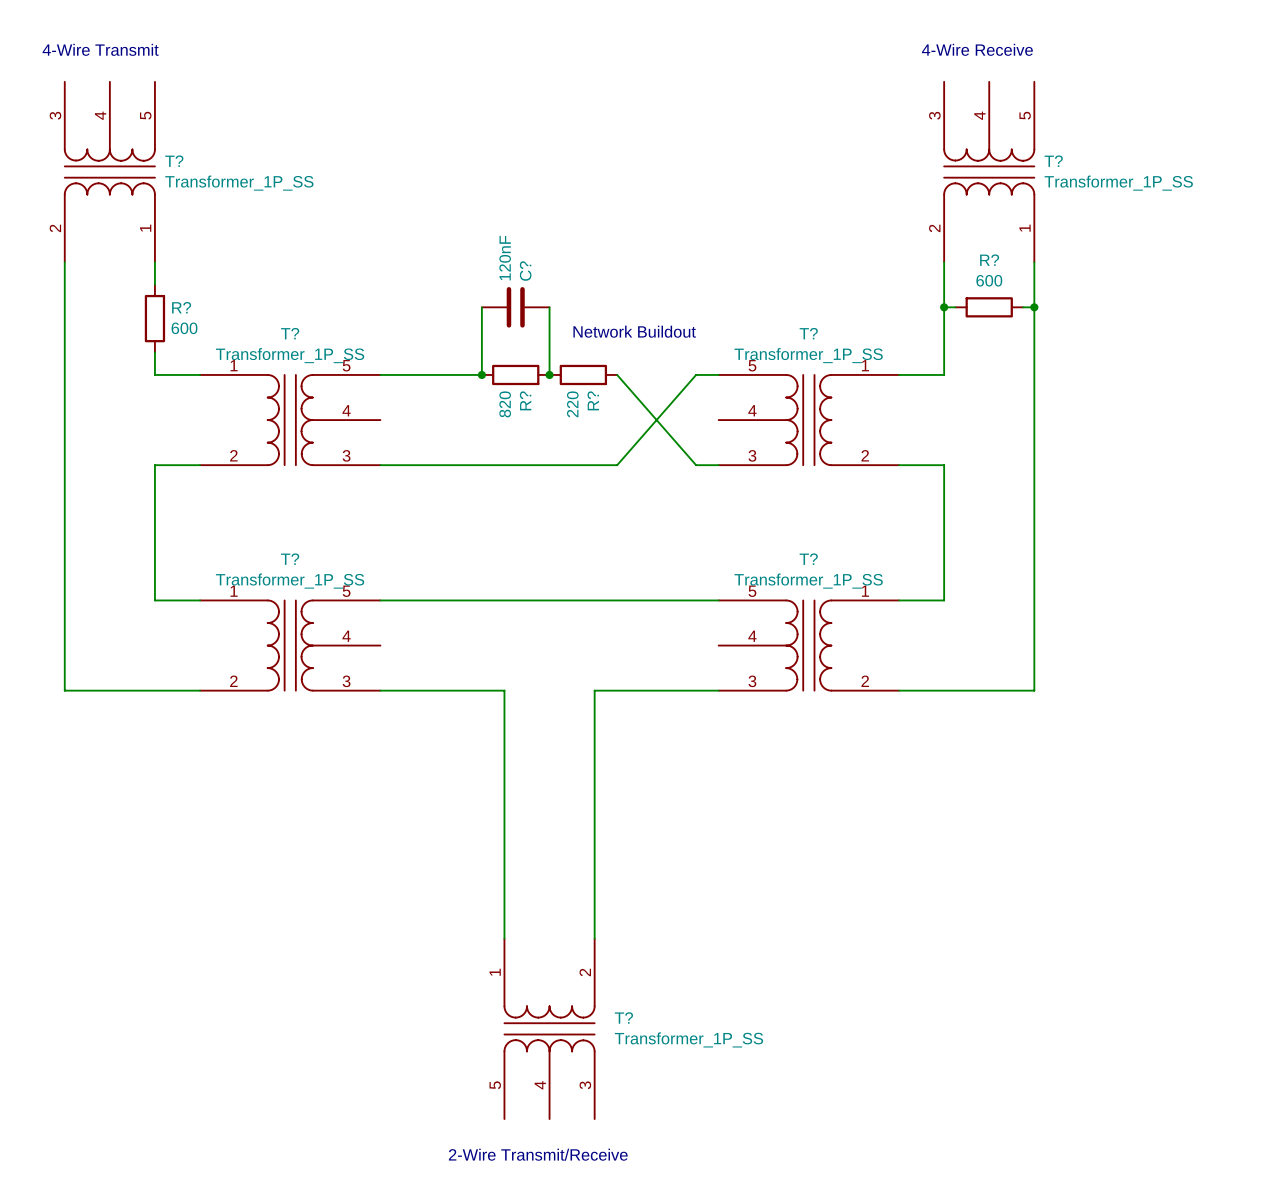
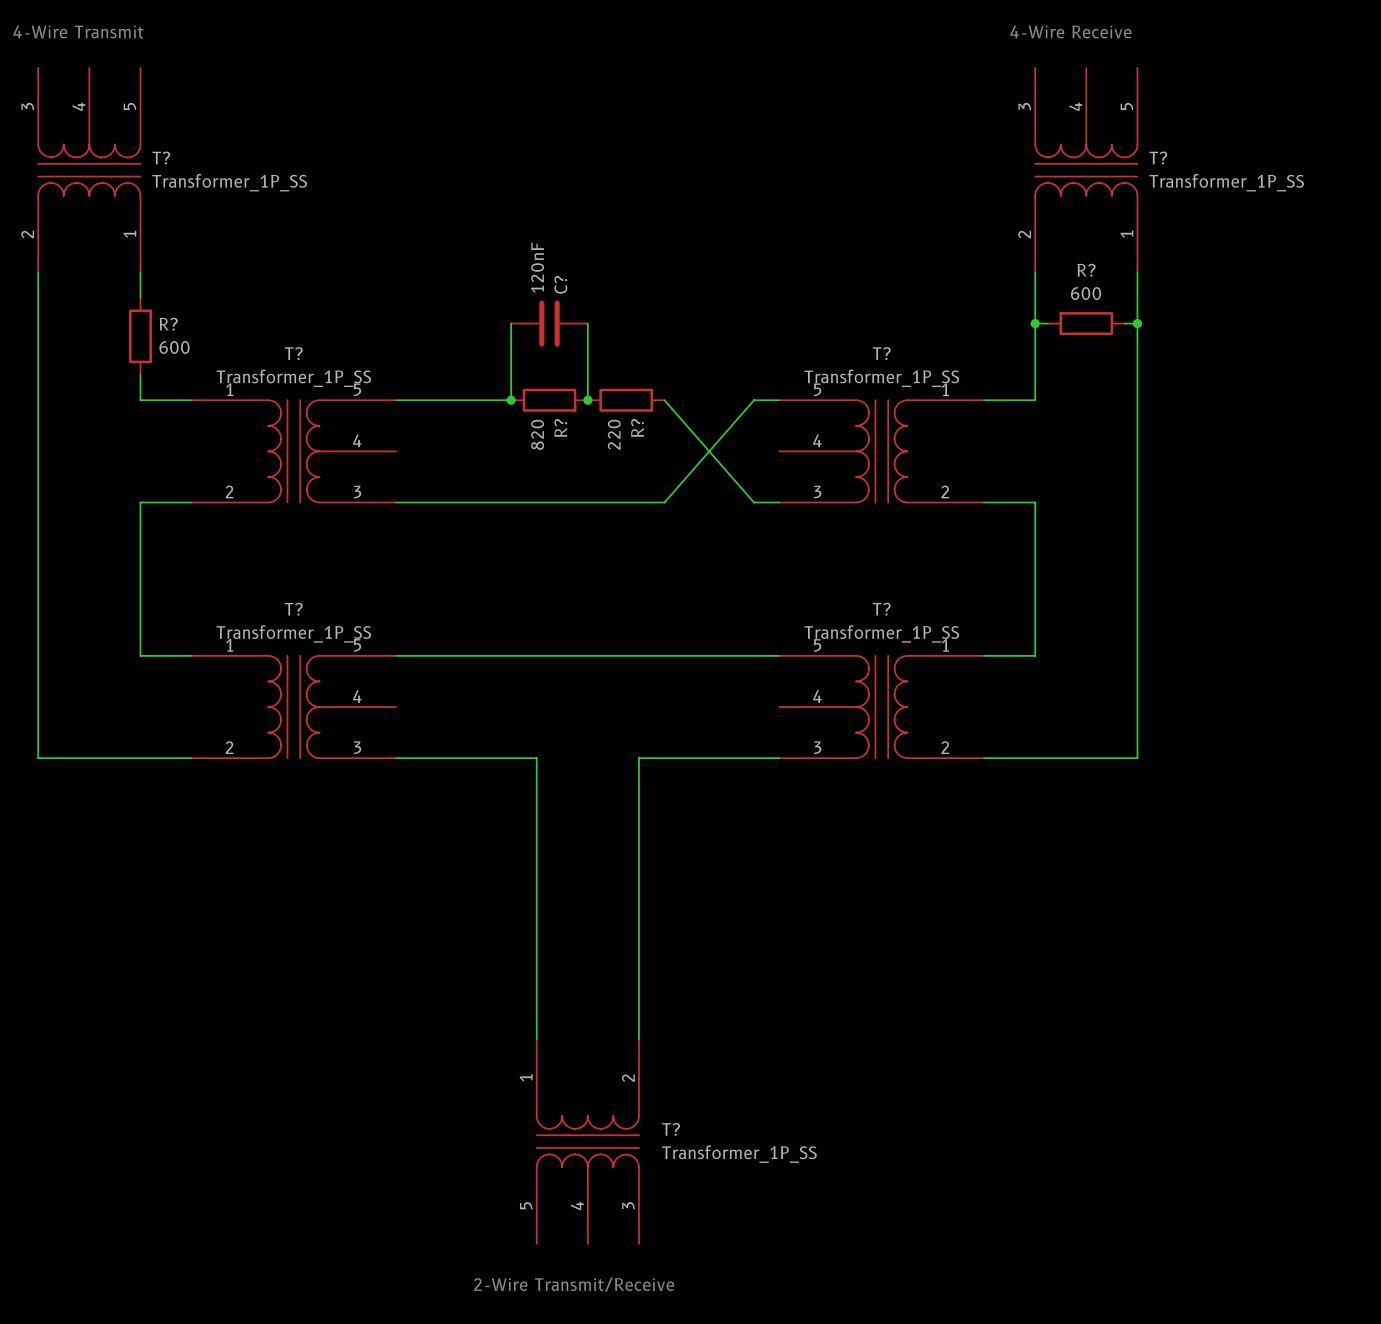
text: Network Buildout (634, 331) -> none

